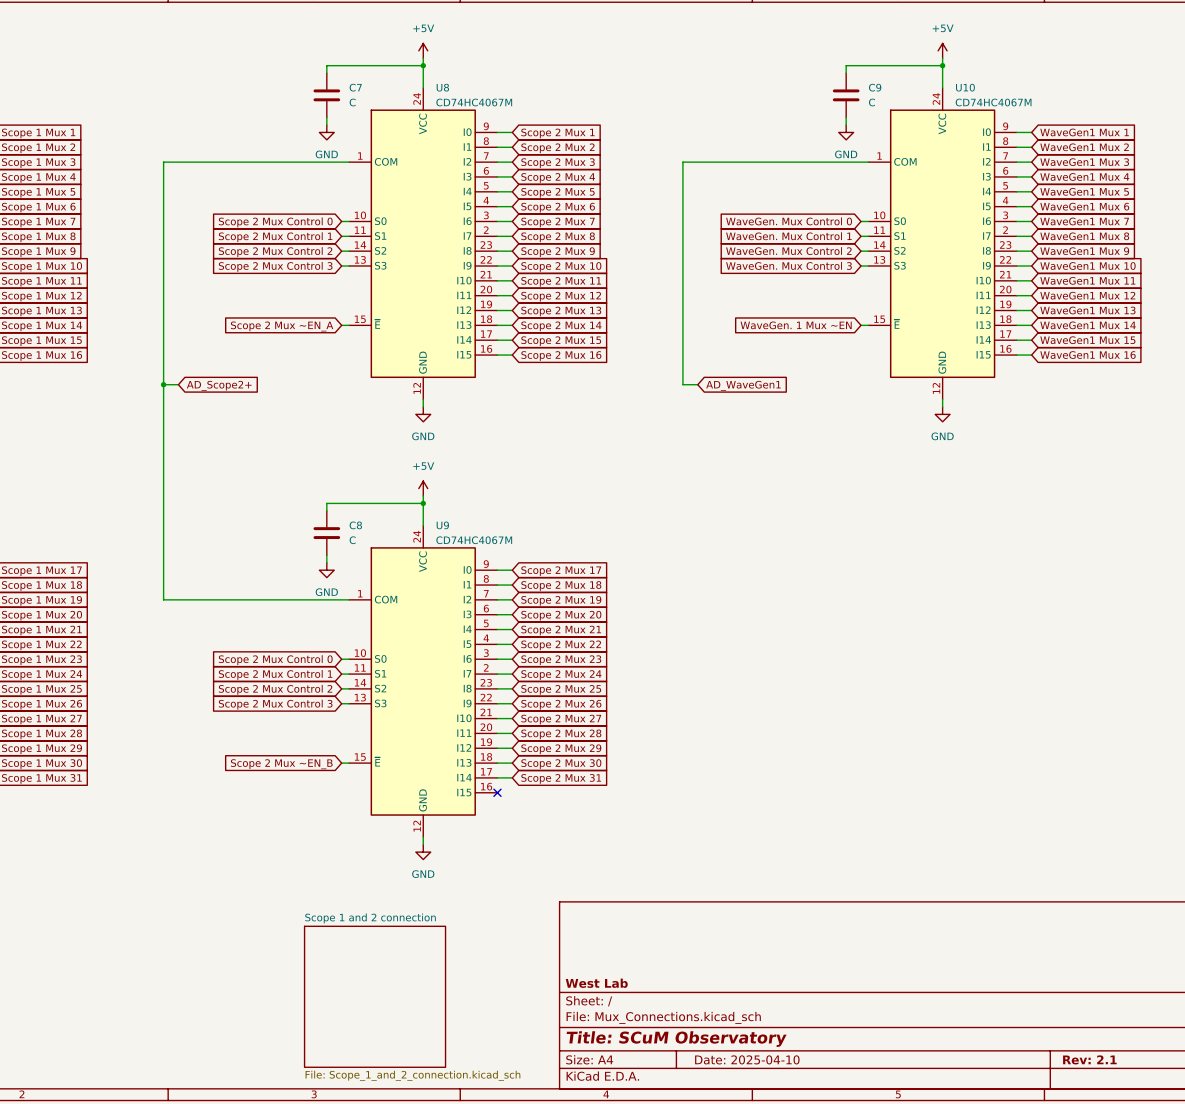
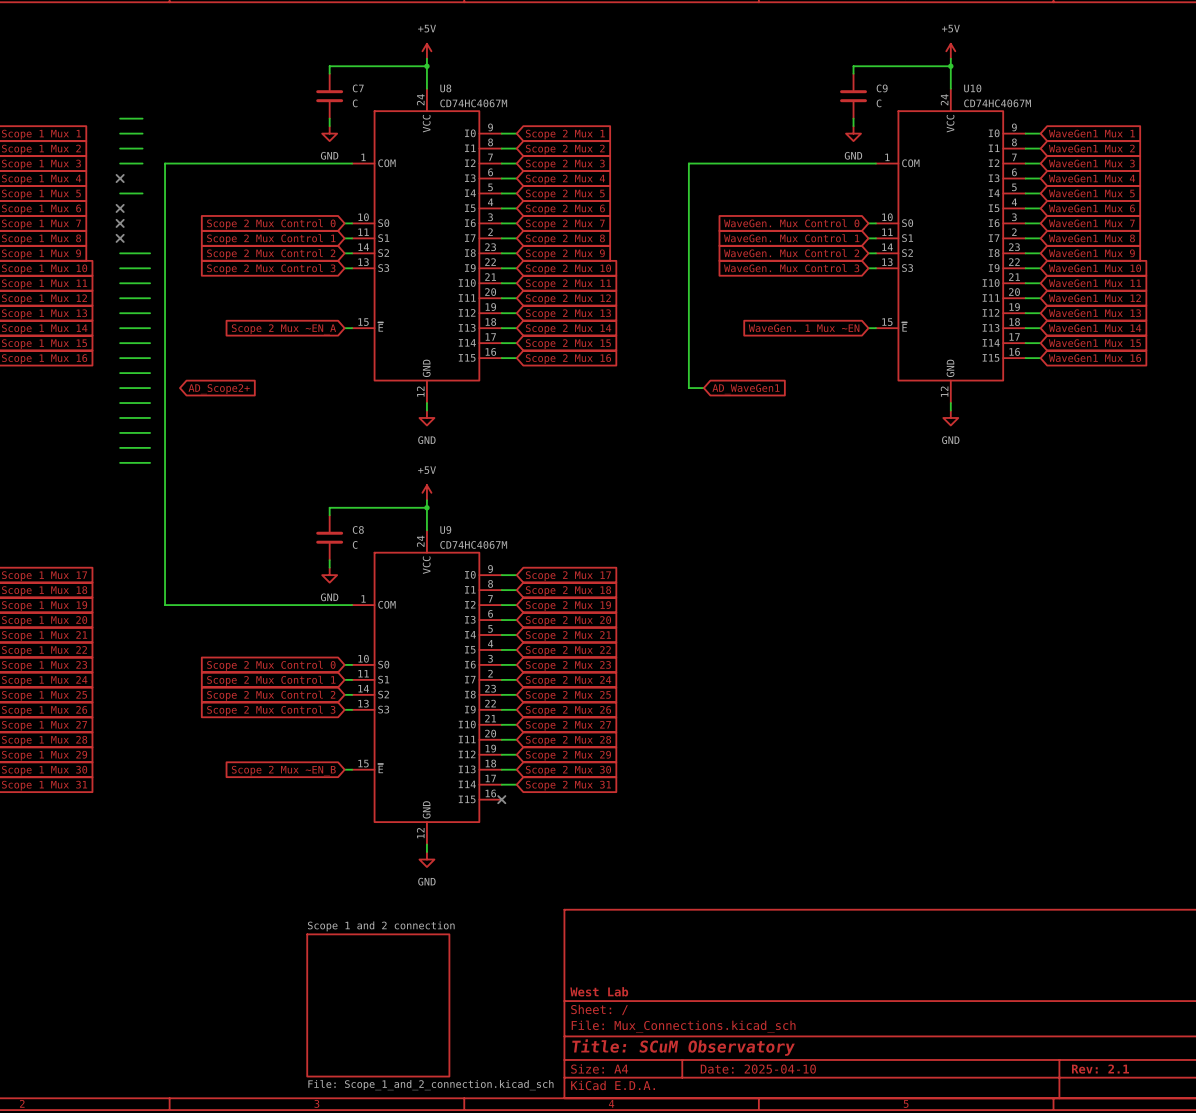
wire: none -> (120, 118) (142, 118)
wire: none -> (120, 133) (142, 133)
wire: none -> (120, 148) (142, 148)
wire: none -> (120, 163) (142, 163)
no-connect mark: none -> (120, 178)
wire: none -> (120, 193) (142, 193)
no-connect mark: none -> (120, 208)
no-connect mark: none -> (120, 223)
no-connect mark: none -> (120, 238)
wire: none -> (120, 253) (150, 253)
wire: none -> (120, 268) (150, 268)
wire: none -> (120, 283) (150, 283)
wire: none -> (120, 298) (150, 298)
wire: none -> (120, 313) (150, 313)
wire: none -> (120, 328) (150, 328)
wire: none -> (120, 343) (150, 343)
wire: none -> (120, 358) (150, 358)
wire: none -> (120, 373) (150, 373)
wire: none -> (120, 388) (150, 388)
wire: (163, 384) (178, 384) -> none
junction: (163, 384) -> none
wire: none -> (120, 403) (150, 403)
wire: none -> (120, 417) (150, 417)
wire: none -> (120, 432) (150, 432)
wire: none -> (120, 447) (150, 447)
wire: none -> (120, 462) (150, 462)

